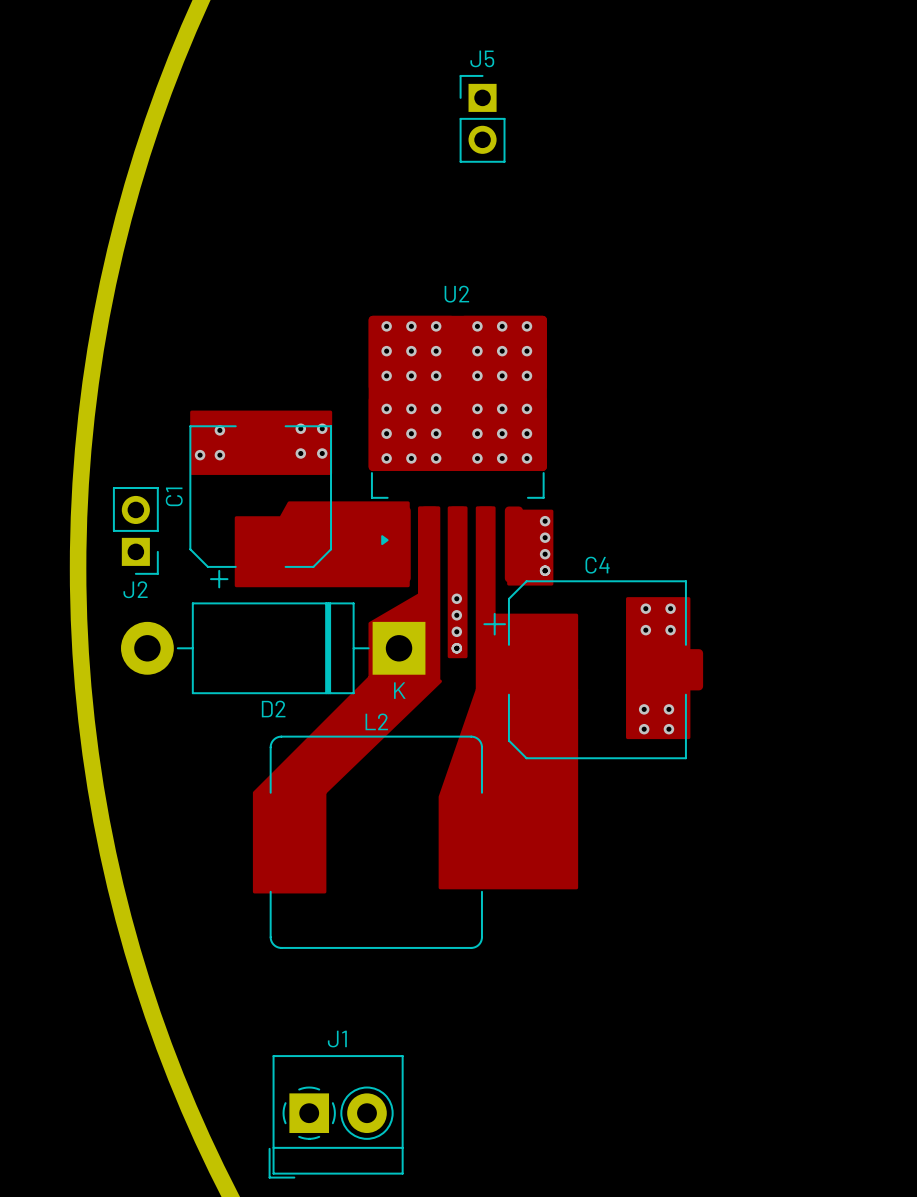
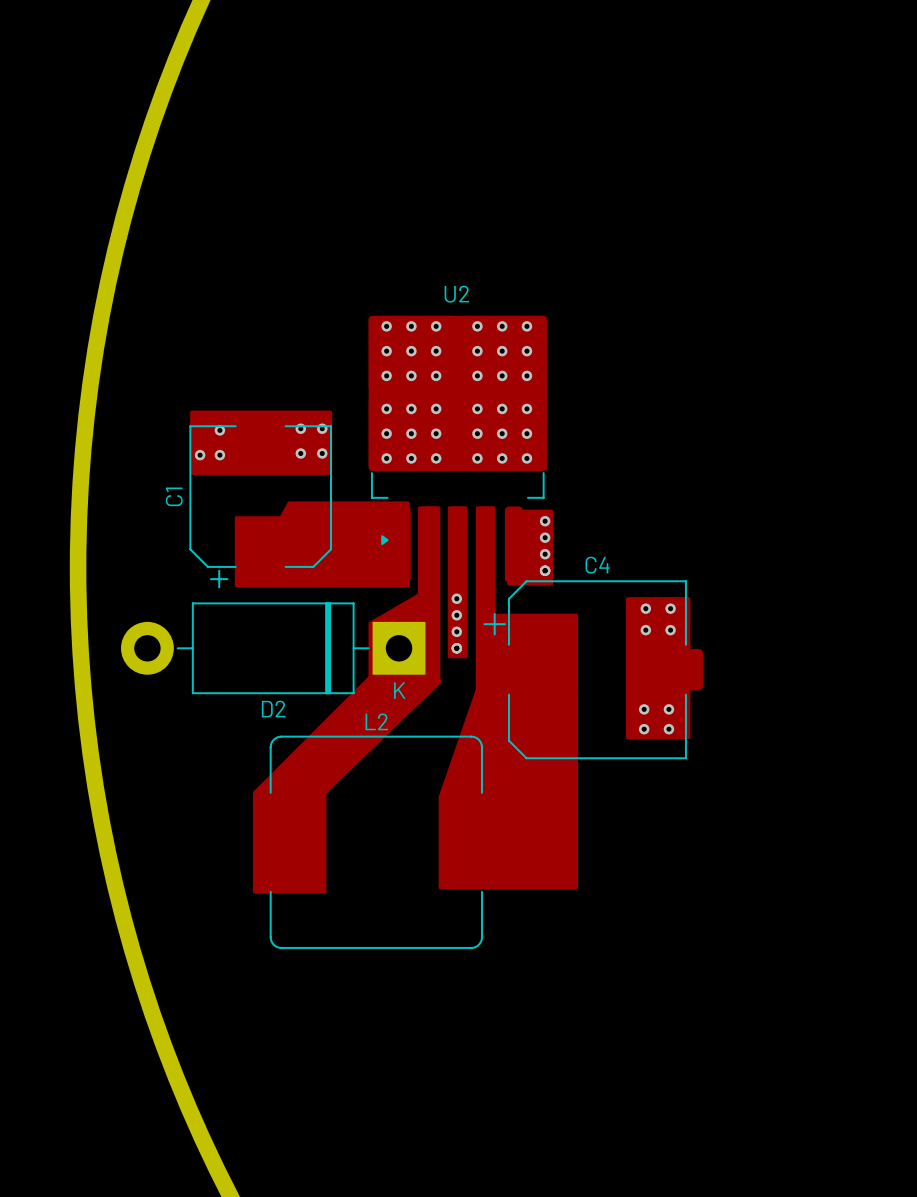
J5: (482, 118) -> none
J2: (135, 530) -> none
J1: (336, 1116) -> none

